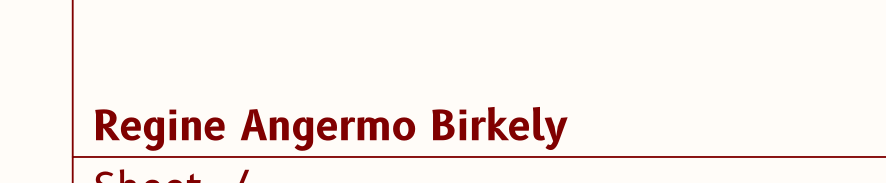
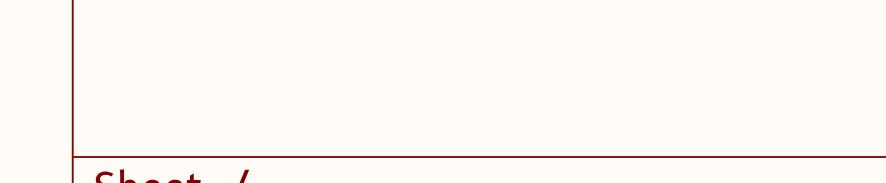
title block: Regine Angermo Birkely (331, 128) -> none

